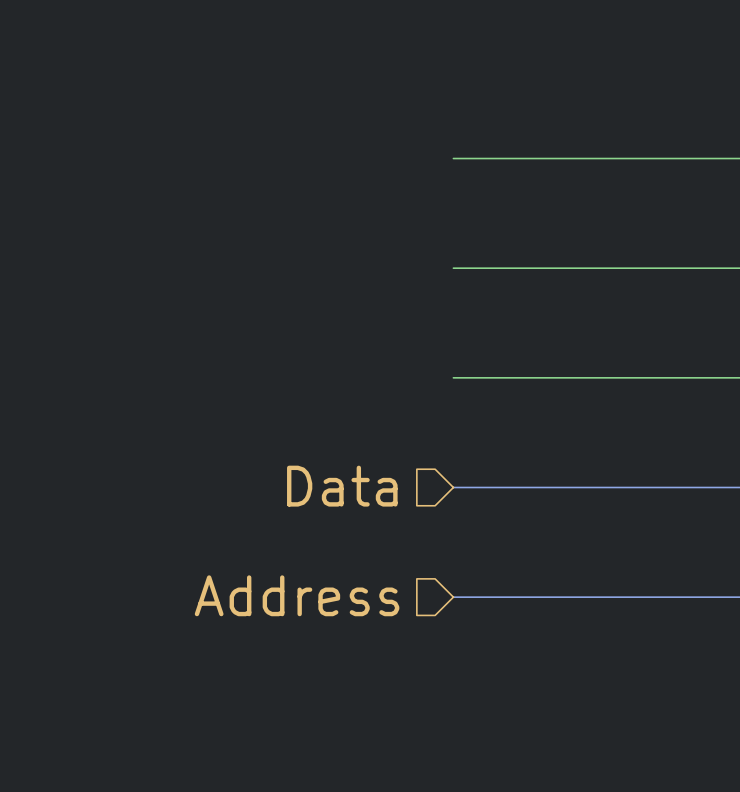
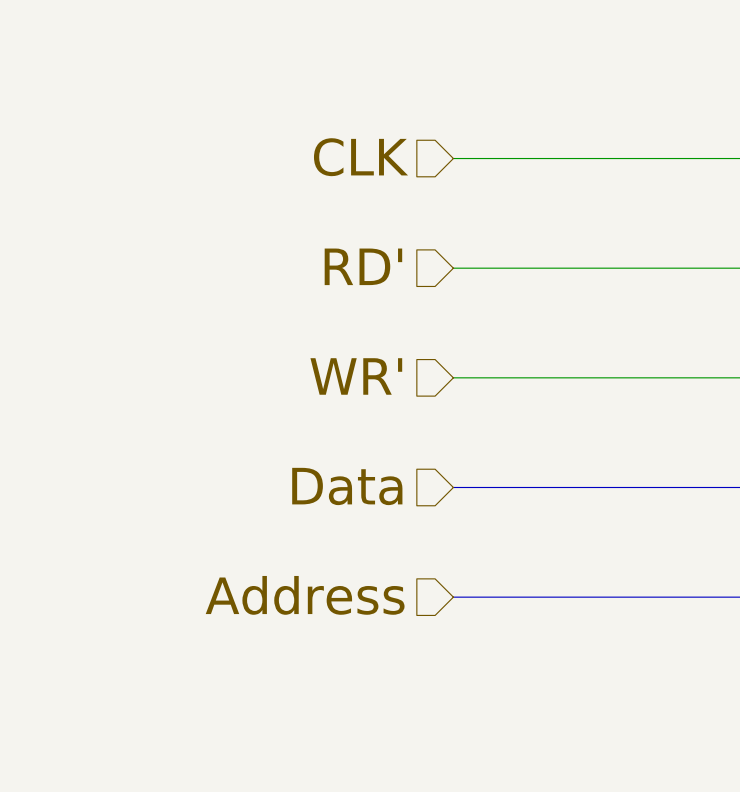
hierarchical label: none -> CLK (361, 157)
hierarchical label: none -> RD' (363, 266)
hierarchical label: none -> WR' (356, 376)

